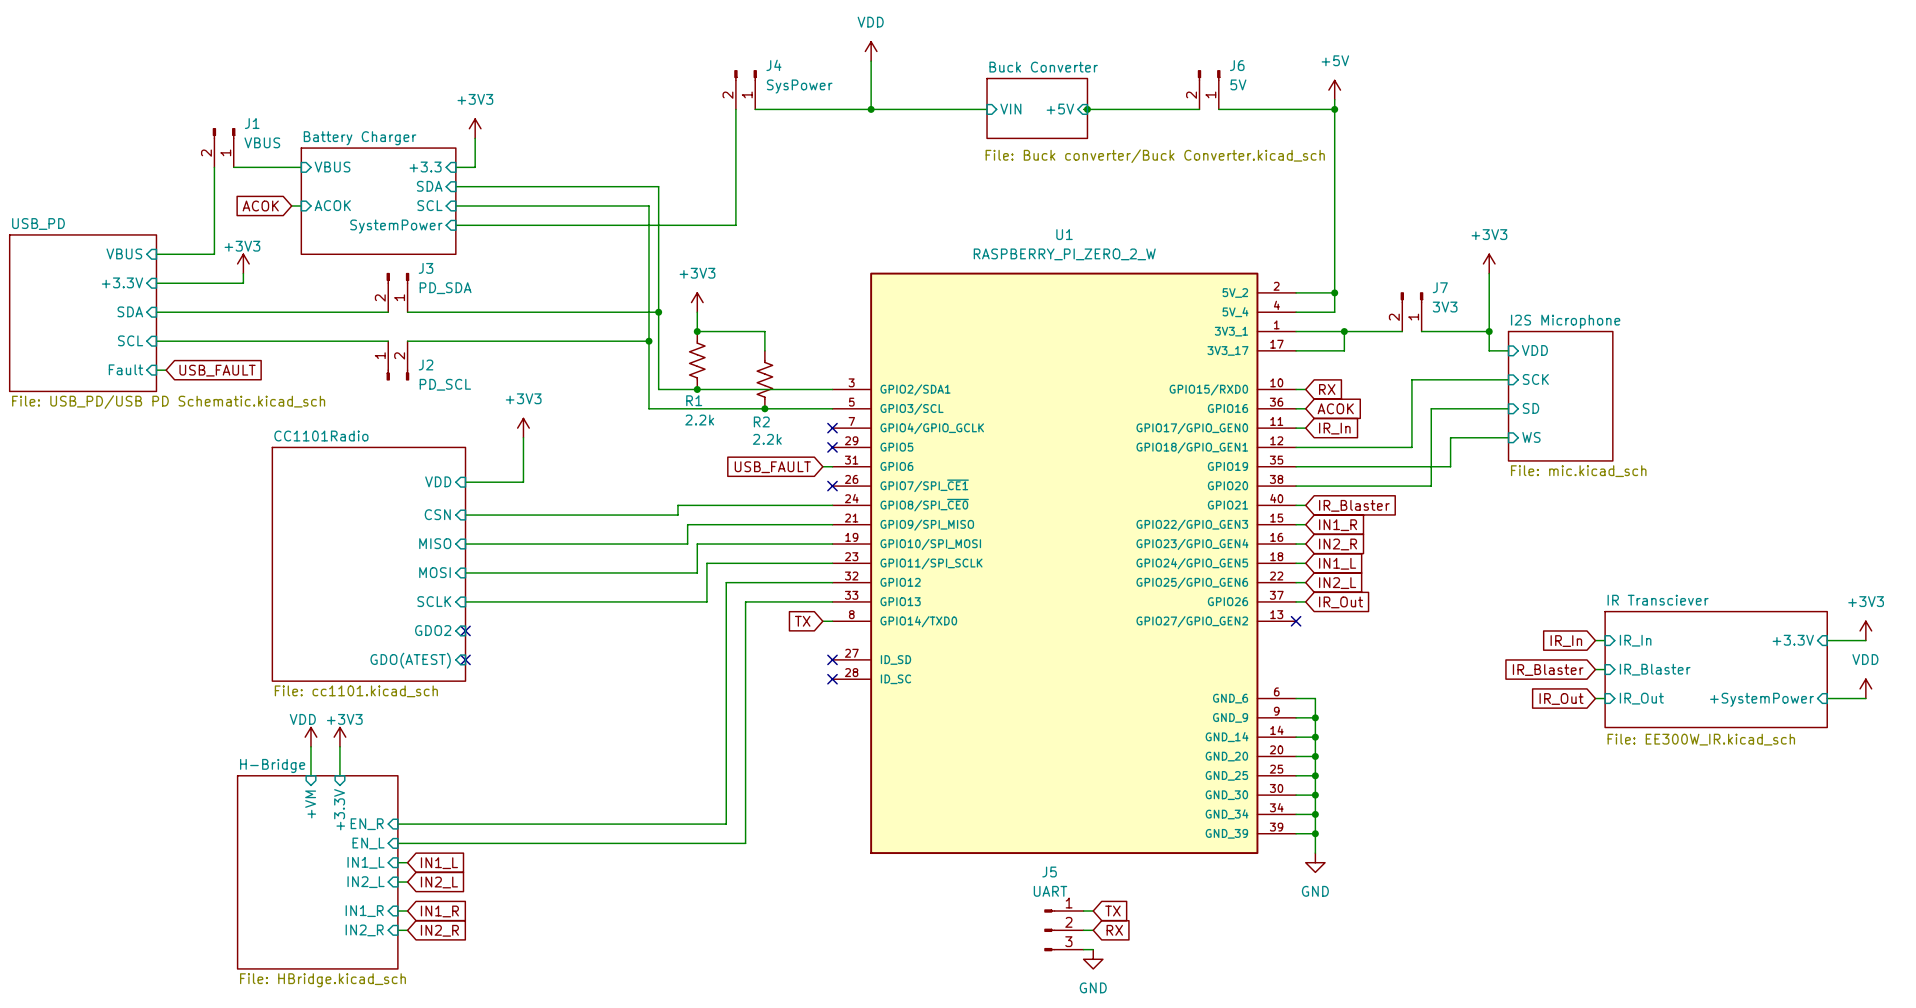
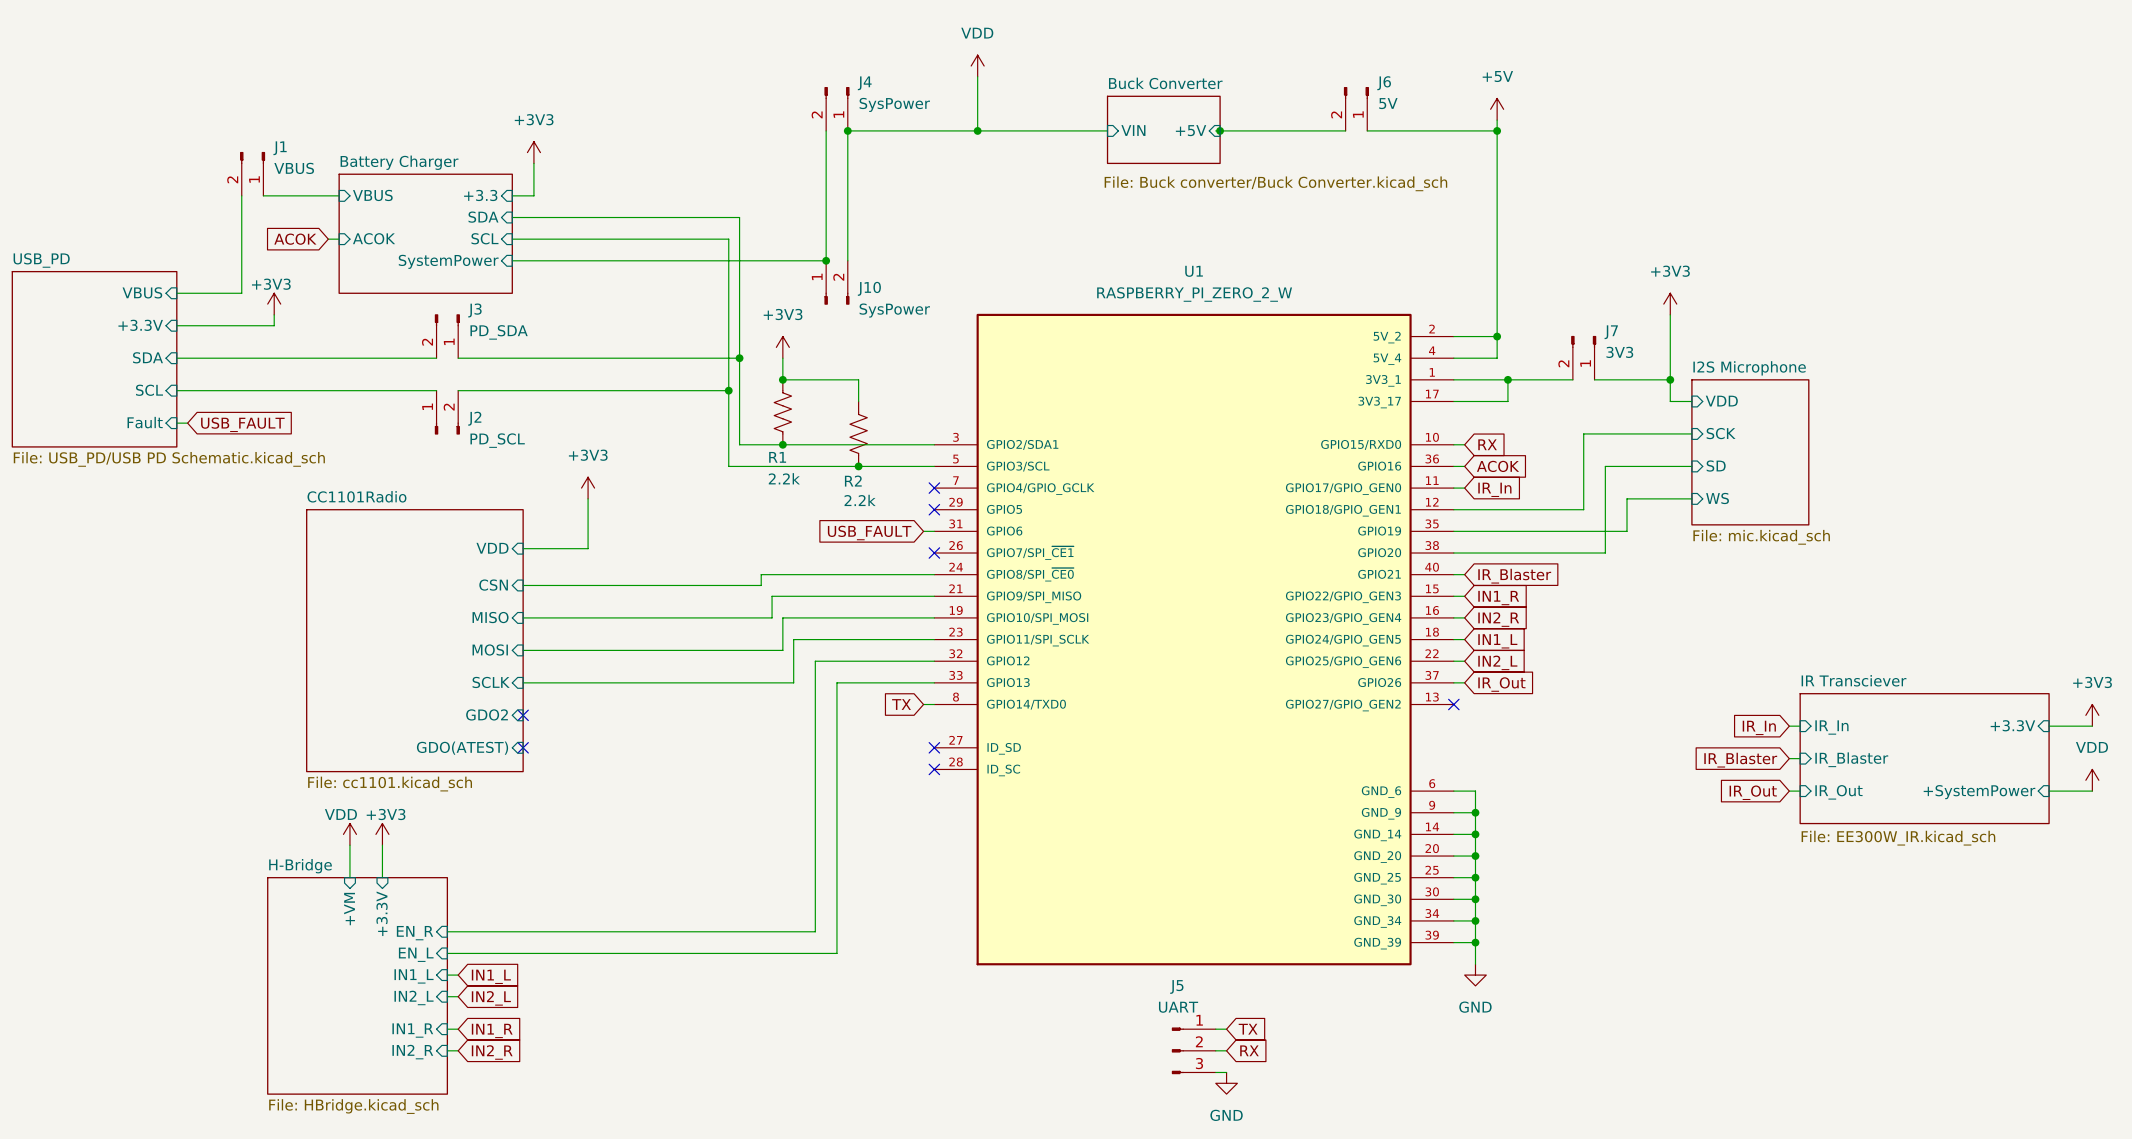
wire: none -> (847, 130) (847, 260)
junction: none -> (847, 130)
junction: none -> (826, 260)
J10: none -> SysPower (836, 282)

